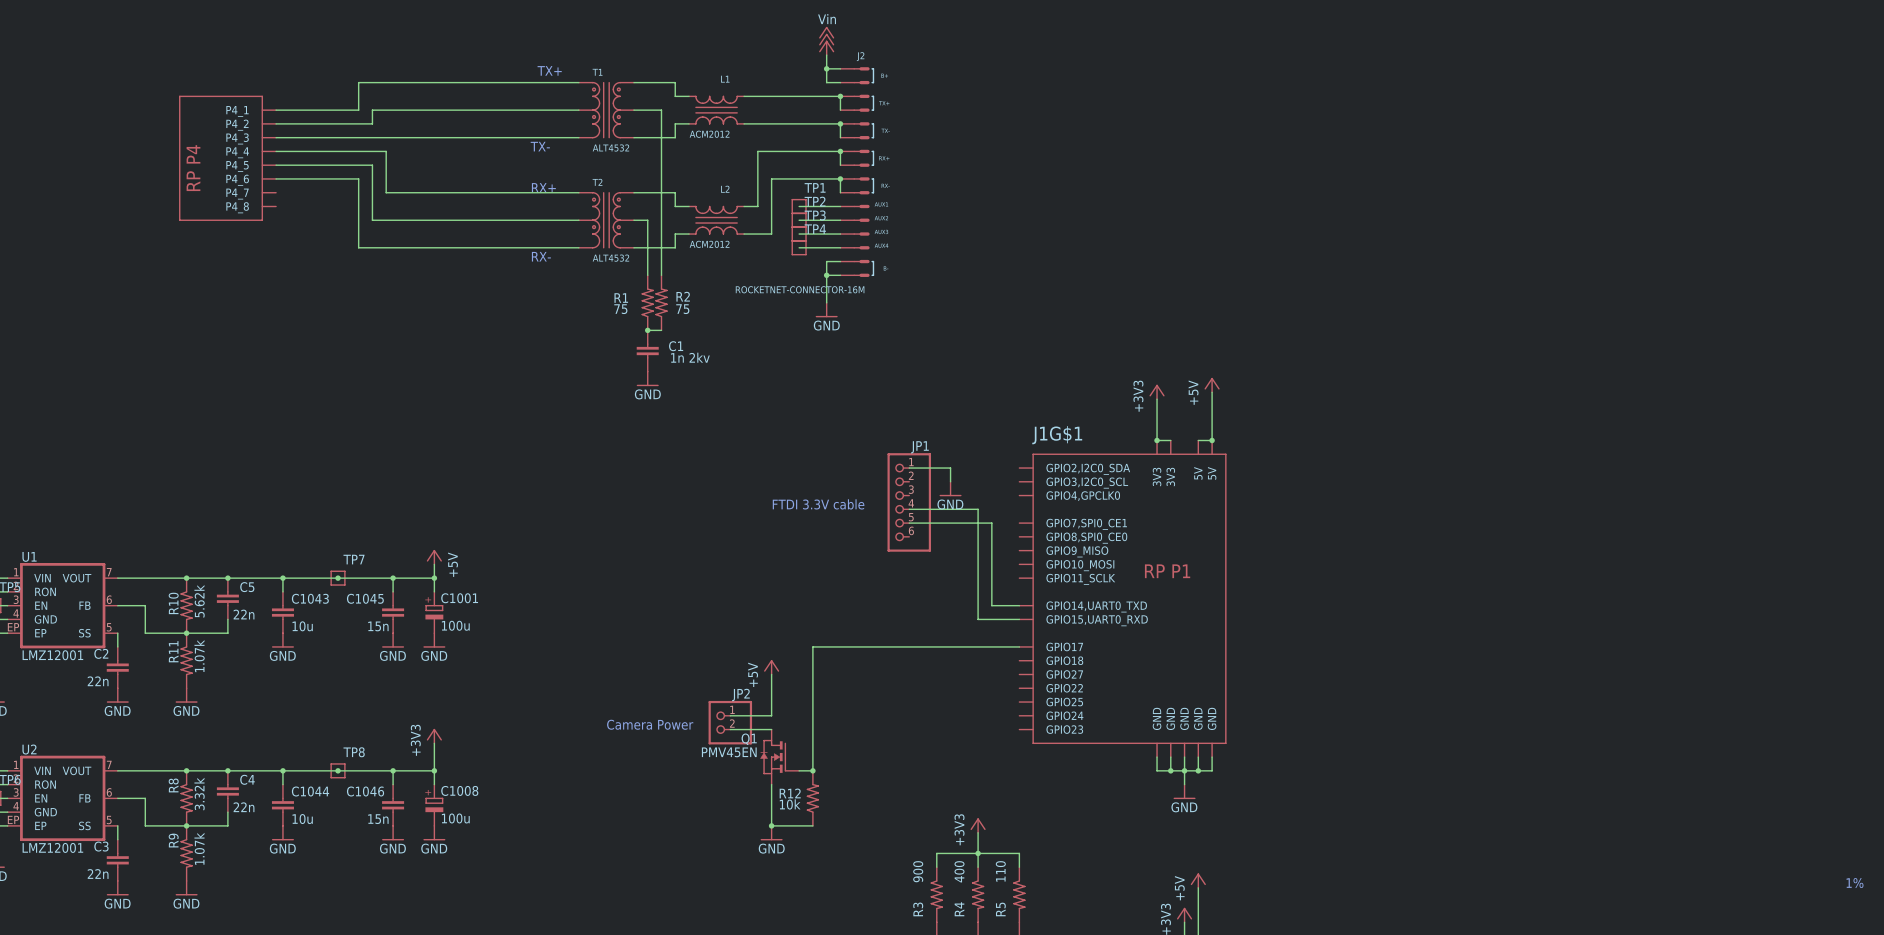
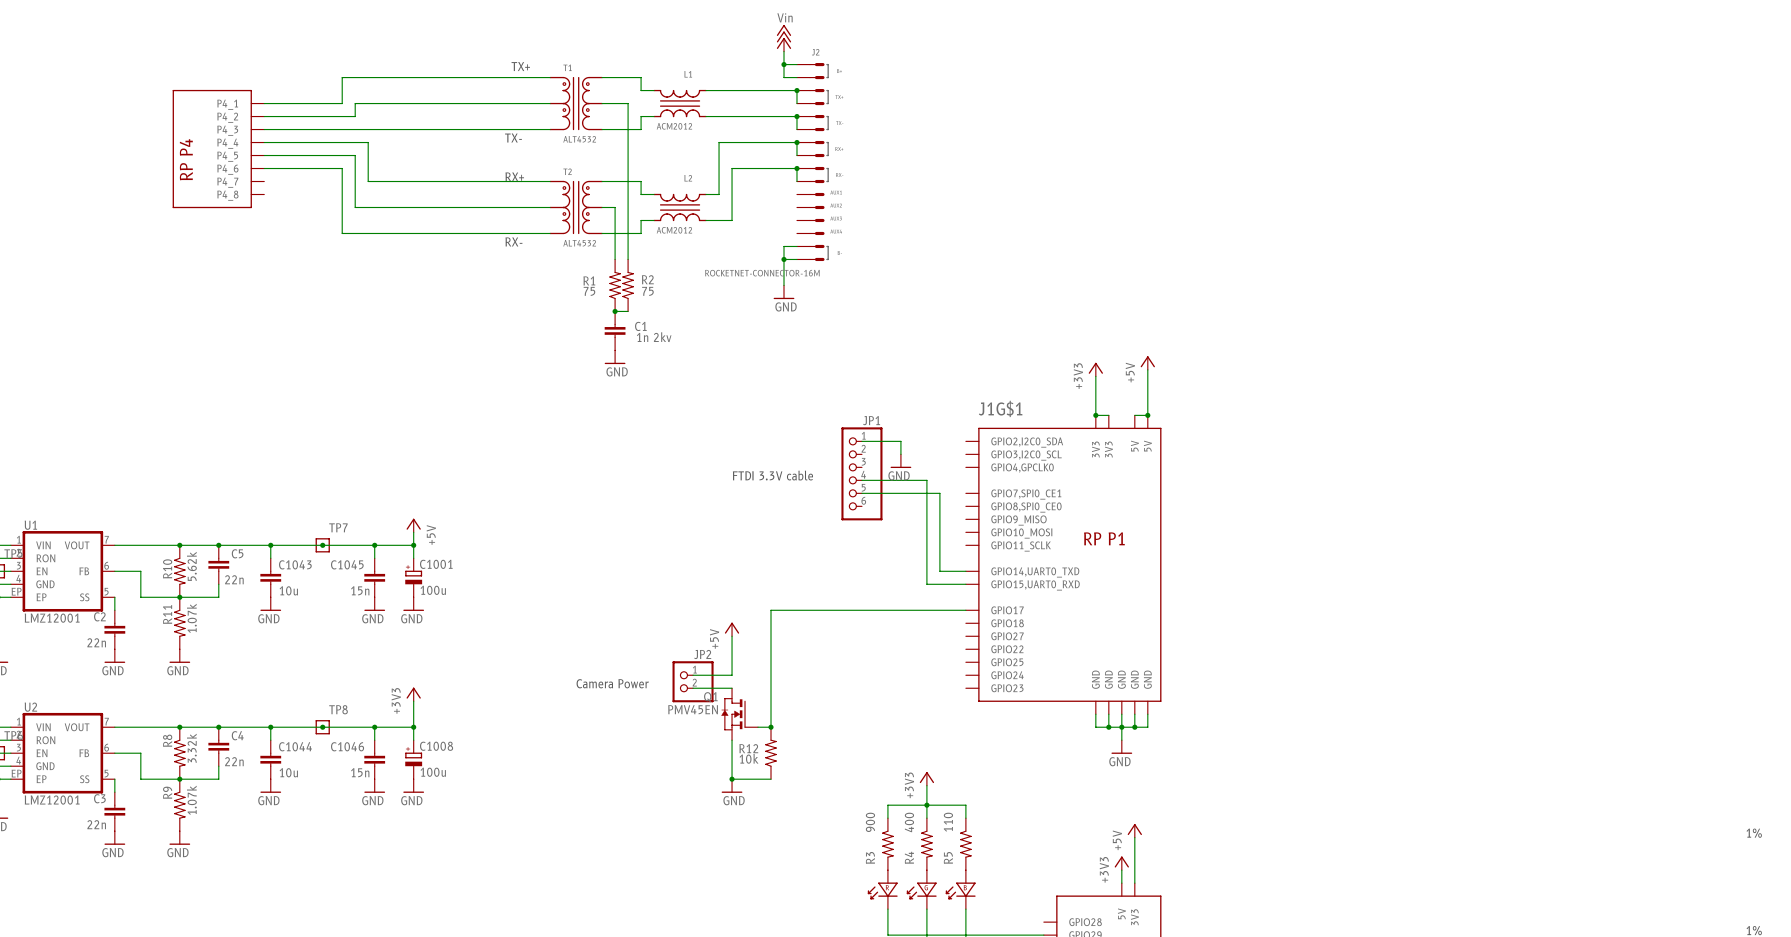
wire: (799, 206) (840, 206) -> none
TP1: (799, 206) -> none
wire: (799, 220) (840, 220) -> none
TP2: (799, 220) -> none
wire: (799, 234) (840, 234) -> none
TP3: (799, 234) -> none
wire: (799, 247) (840, 247) -> none
TP4: (799, 247) -> none

